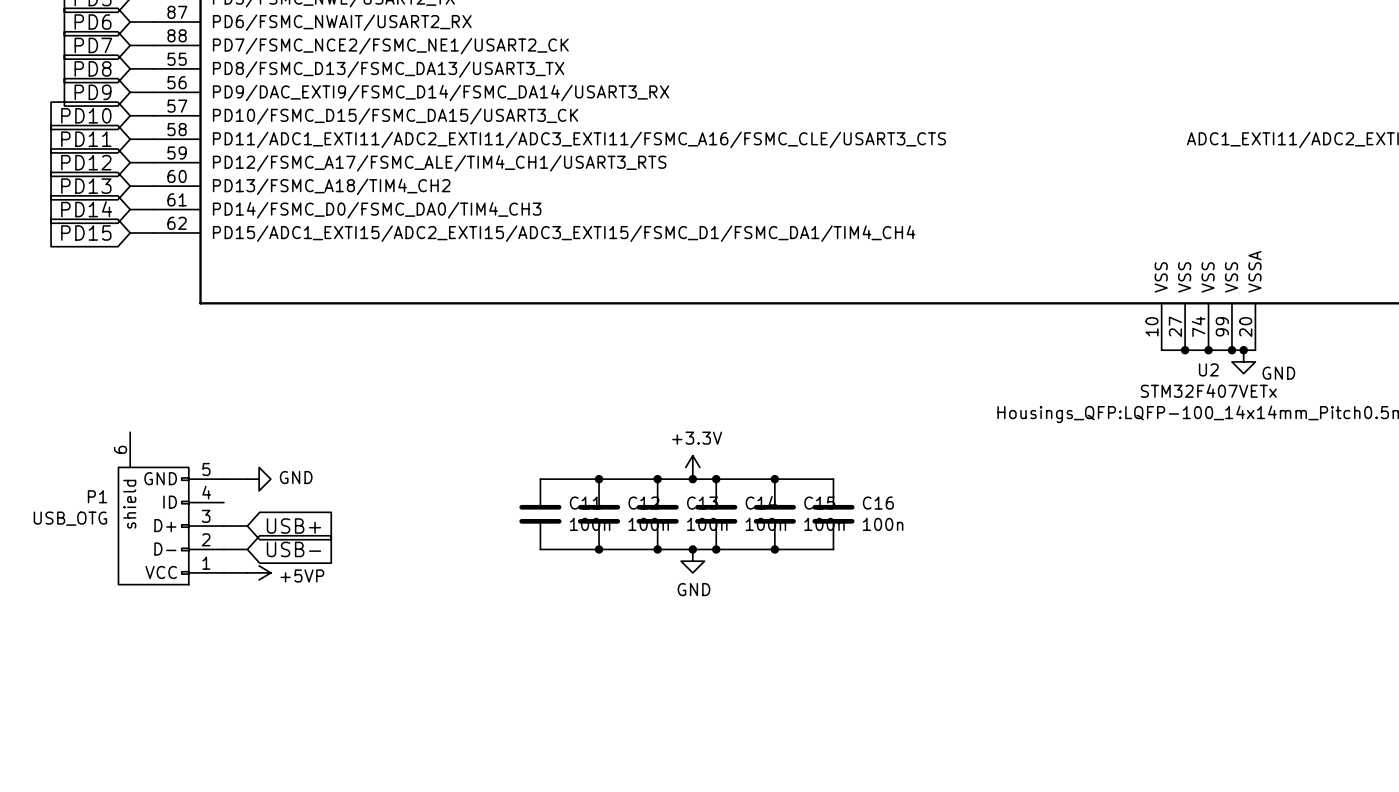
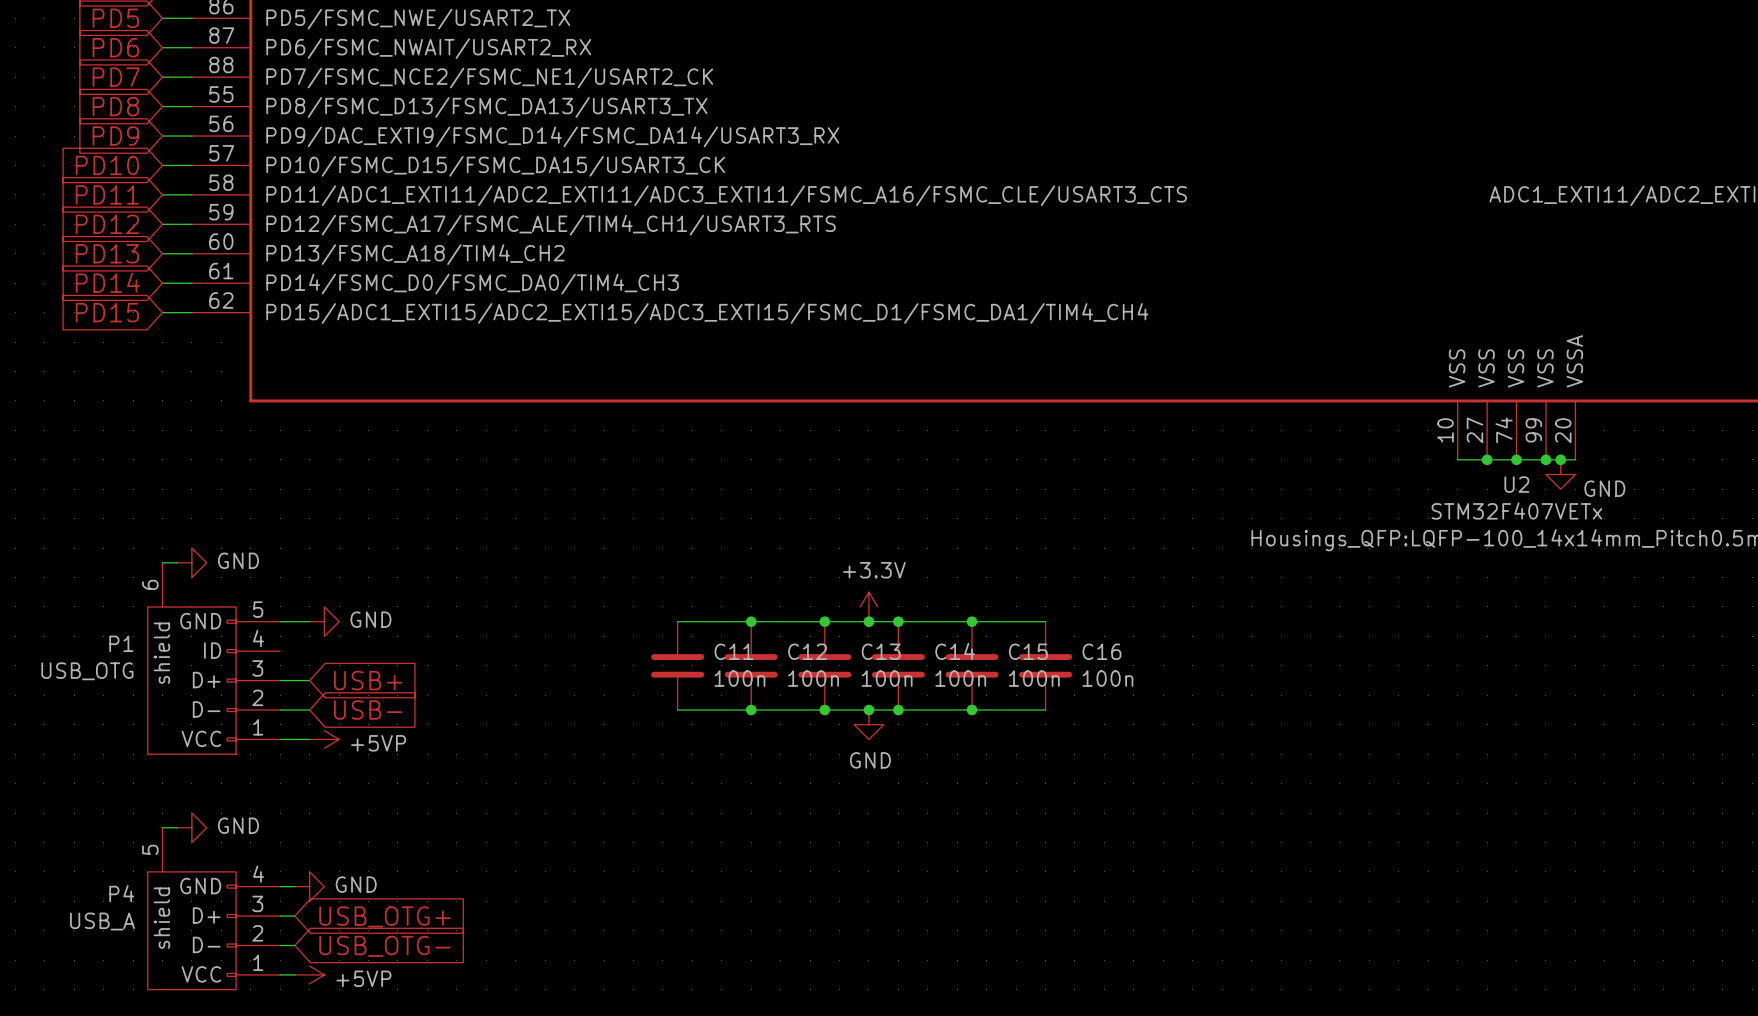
wire: none -> (162, 562) (177, 562)
power symbol: none -> GND (191, 562)
wire: none -> (162, 827) (177, 827)
power symbol: none -> GND (191, 827)
wire: none -> (280, 886) (294, 886)
power symbol: none -> GND (309, 886)
P4: none -> USB_A (213, 908)
wire: none -> (280, 916) (294, 916)
global label: none -> USB_OTG+ (384, 916)
wire: none -> (280, 945) (294, 945)
global label: none -> USB_OTG- (384, 946)
wire: none -> (280, 974) (294, 974)
power symbol: none -> +5VP (309, 974)

